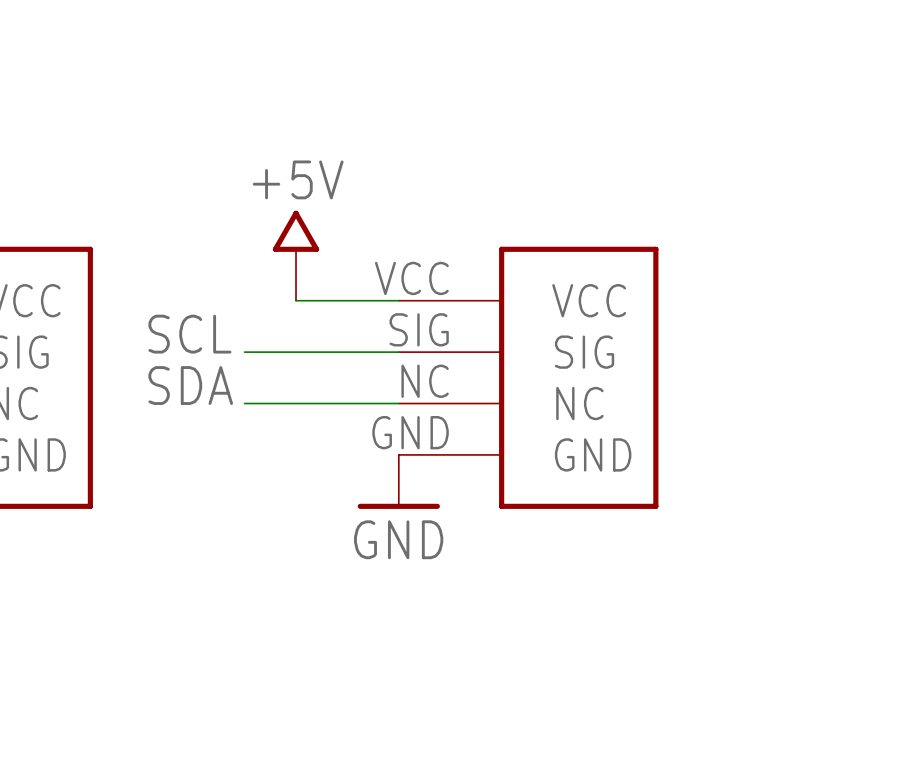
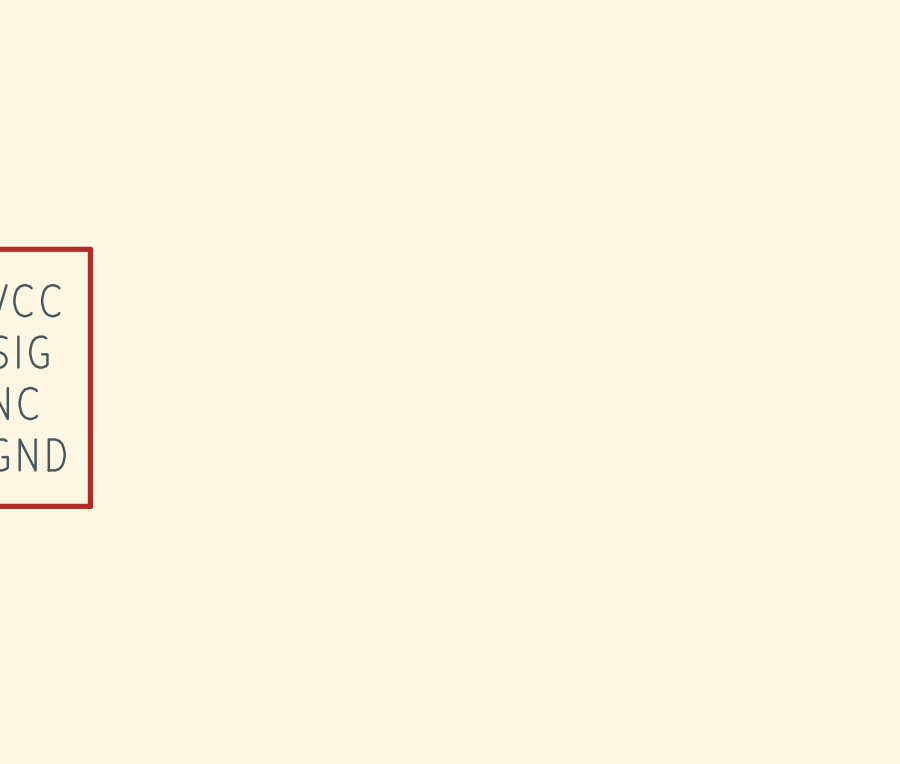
power symbol: +5V (296, 255) -> none
wire: (296, 300) (398, 300) -> none
label: SCL (189, 334) -> none
wire: (244, 352) (398, 352) -> none
part: (528, 377) -> none
label: SDA (190, 385) -> none
wire: (244, 403) (398, 403) -> none
power symbol: GND (398, 481) -> none

